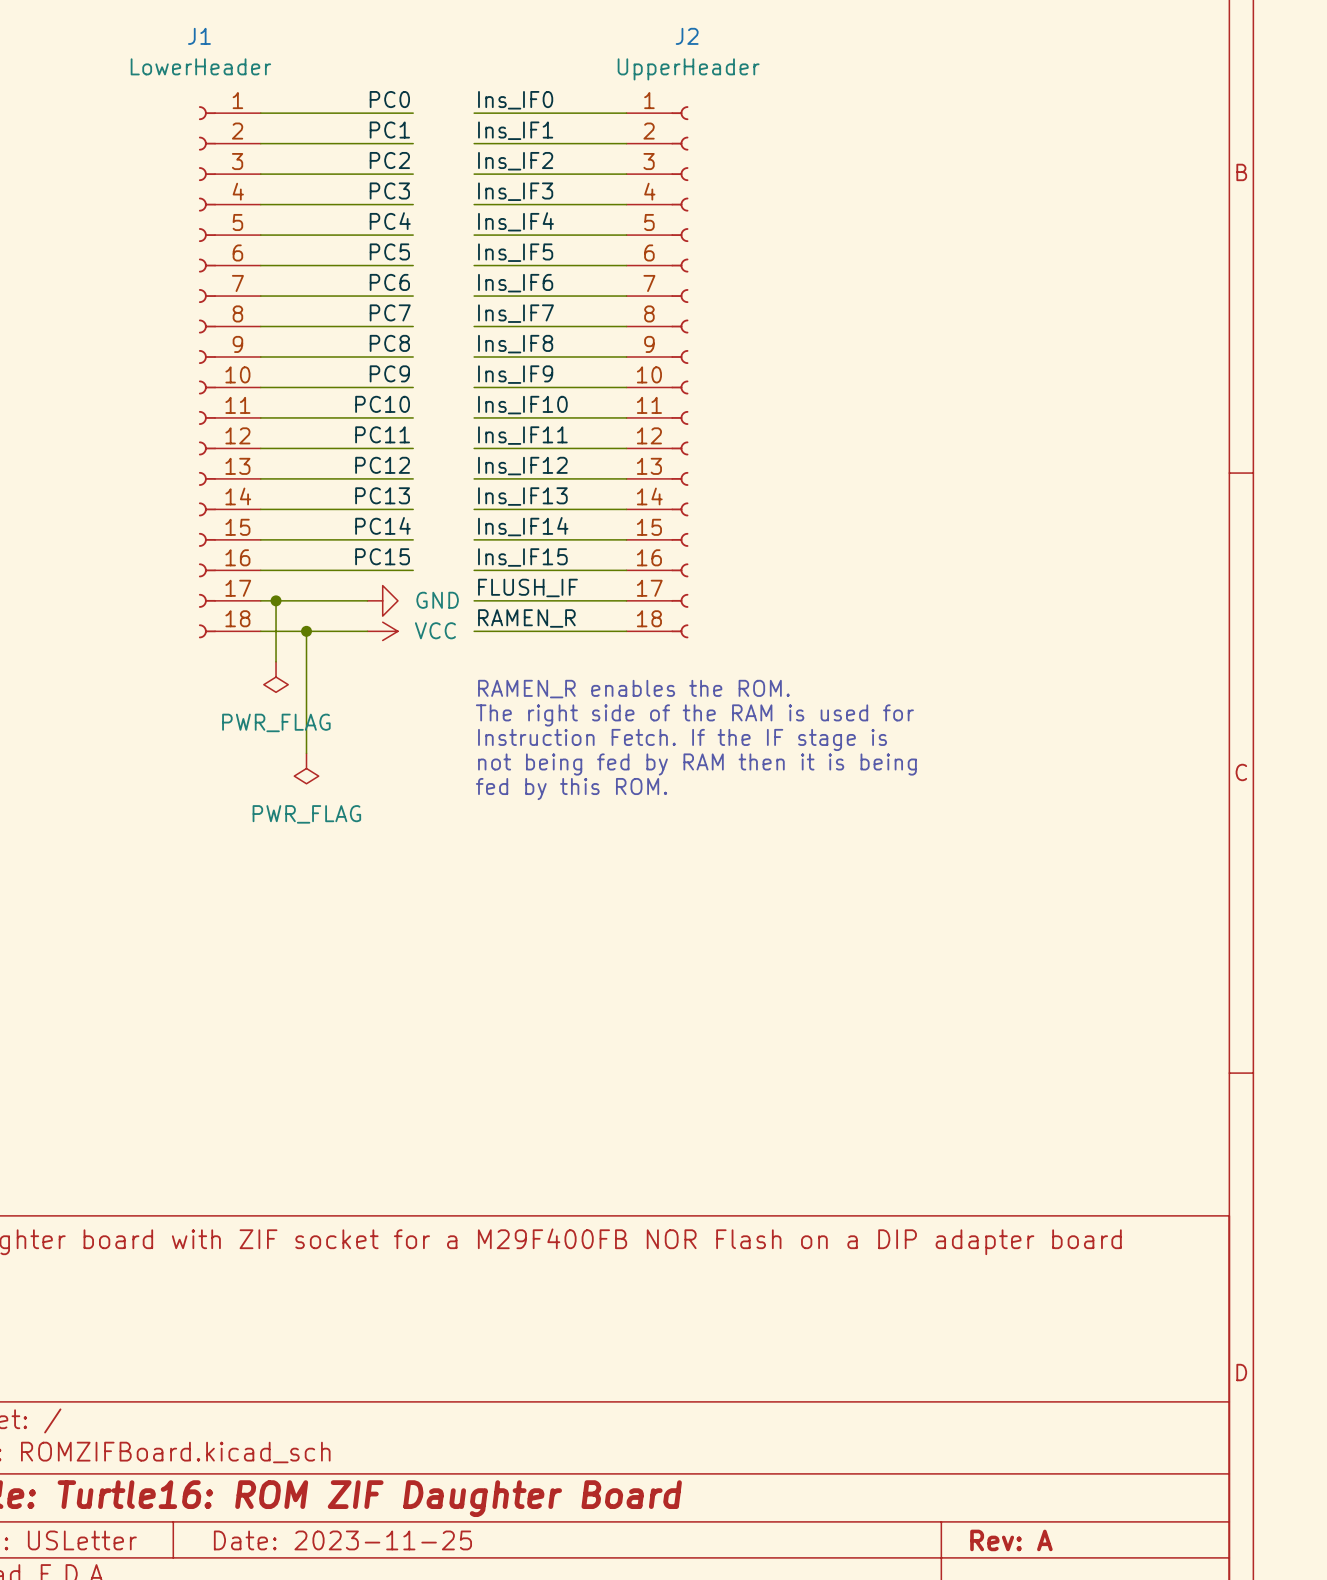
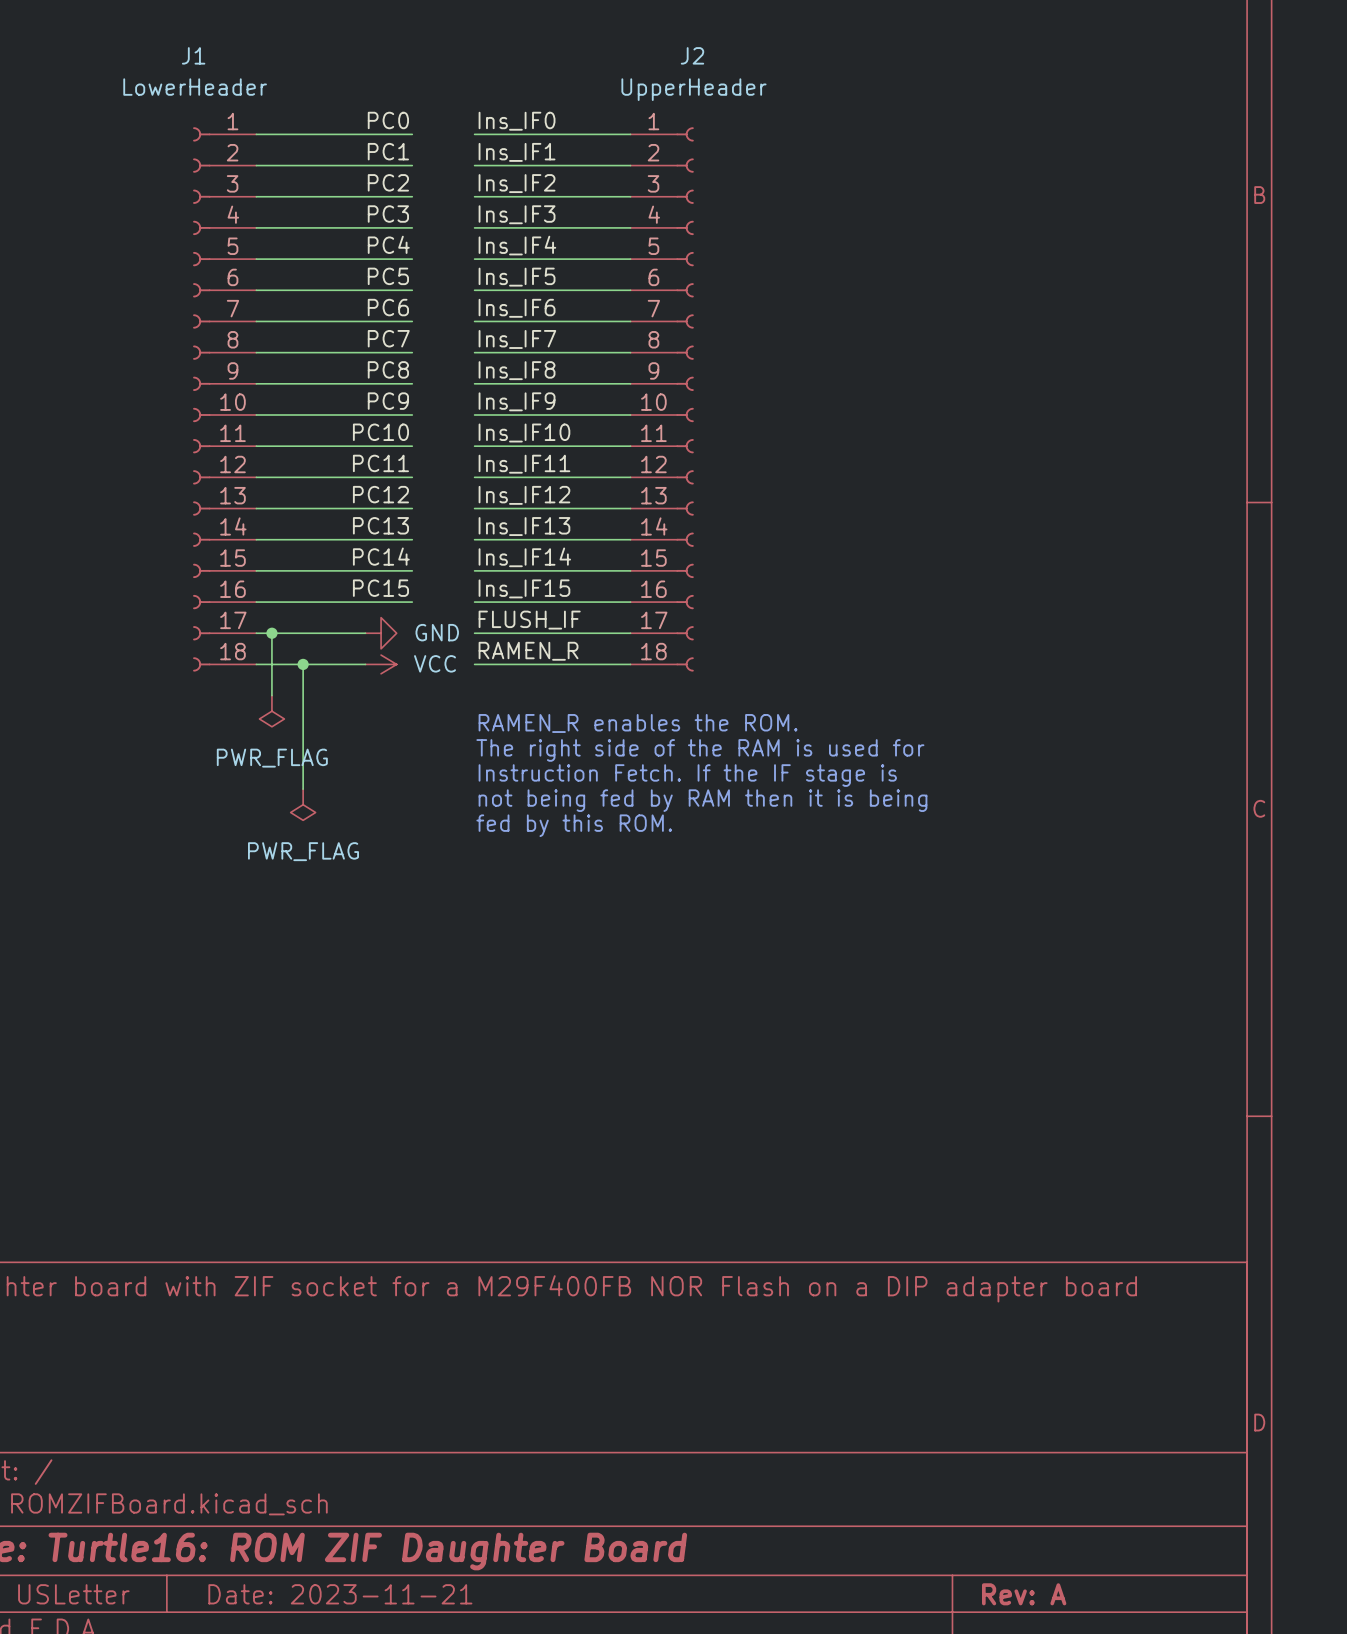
title block: Date: 2023-11-25 (342, 1540) -> Date: 2023-11-21 (340, 1594)

